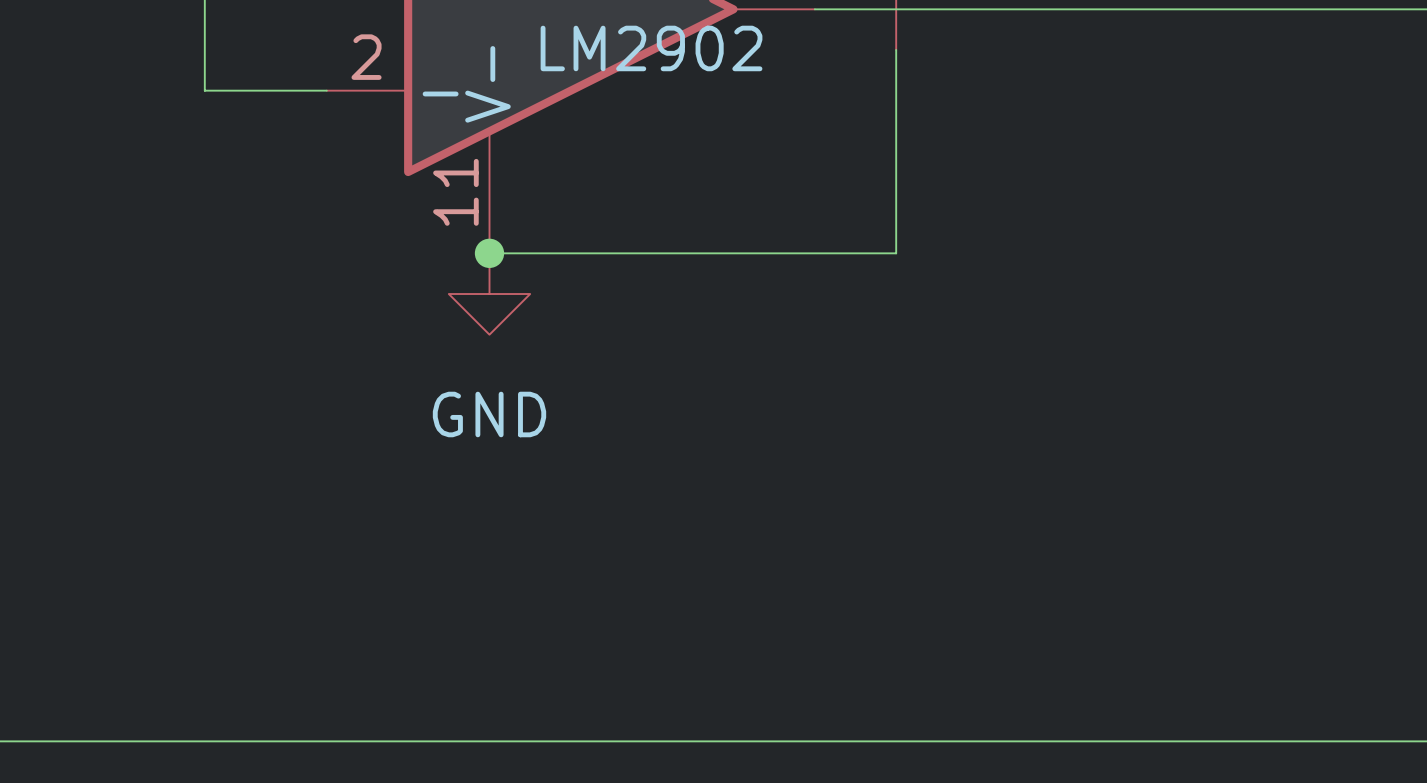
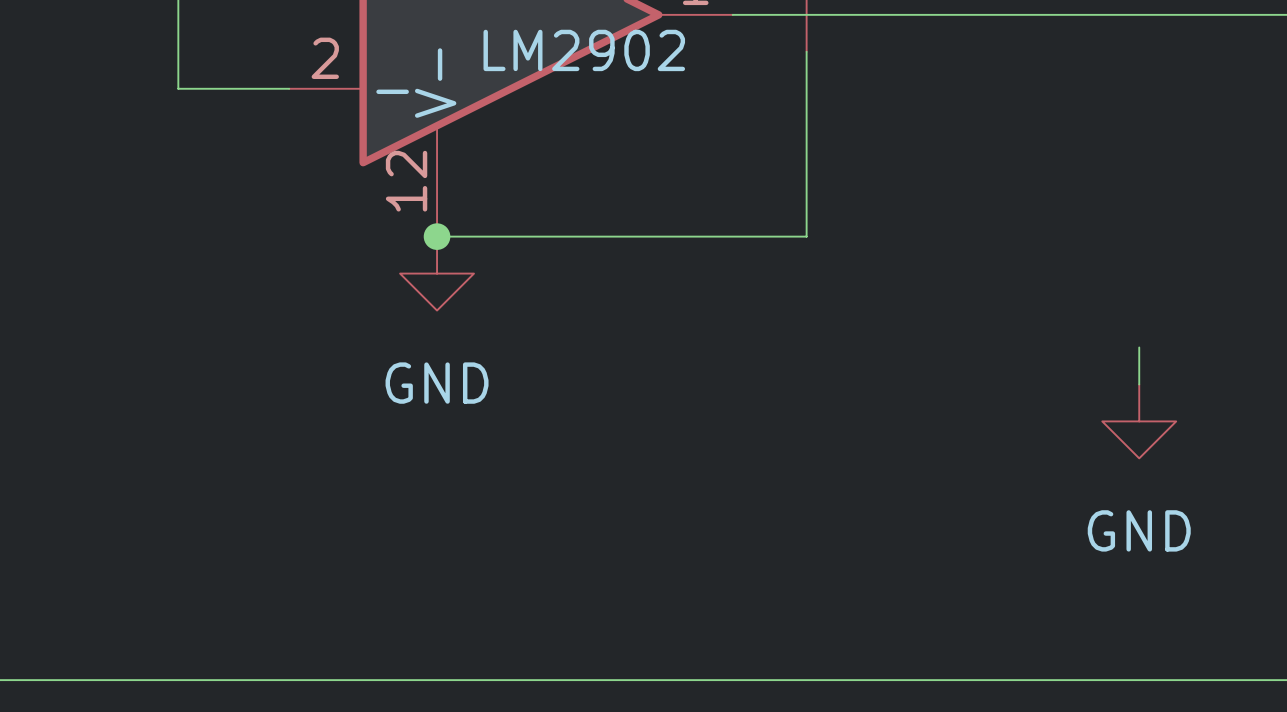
part pin number: 11 (455, 192) -> 12 (406, 181)
wire: none -> (1139, 347) (1139, 384)
power symbol: none -> GND (1139, 421)

